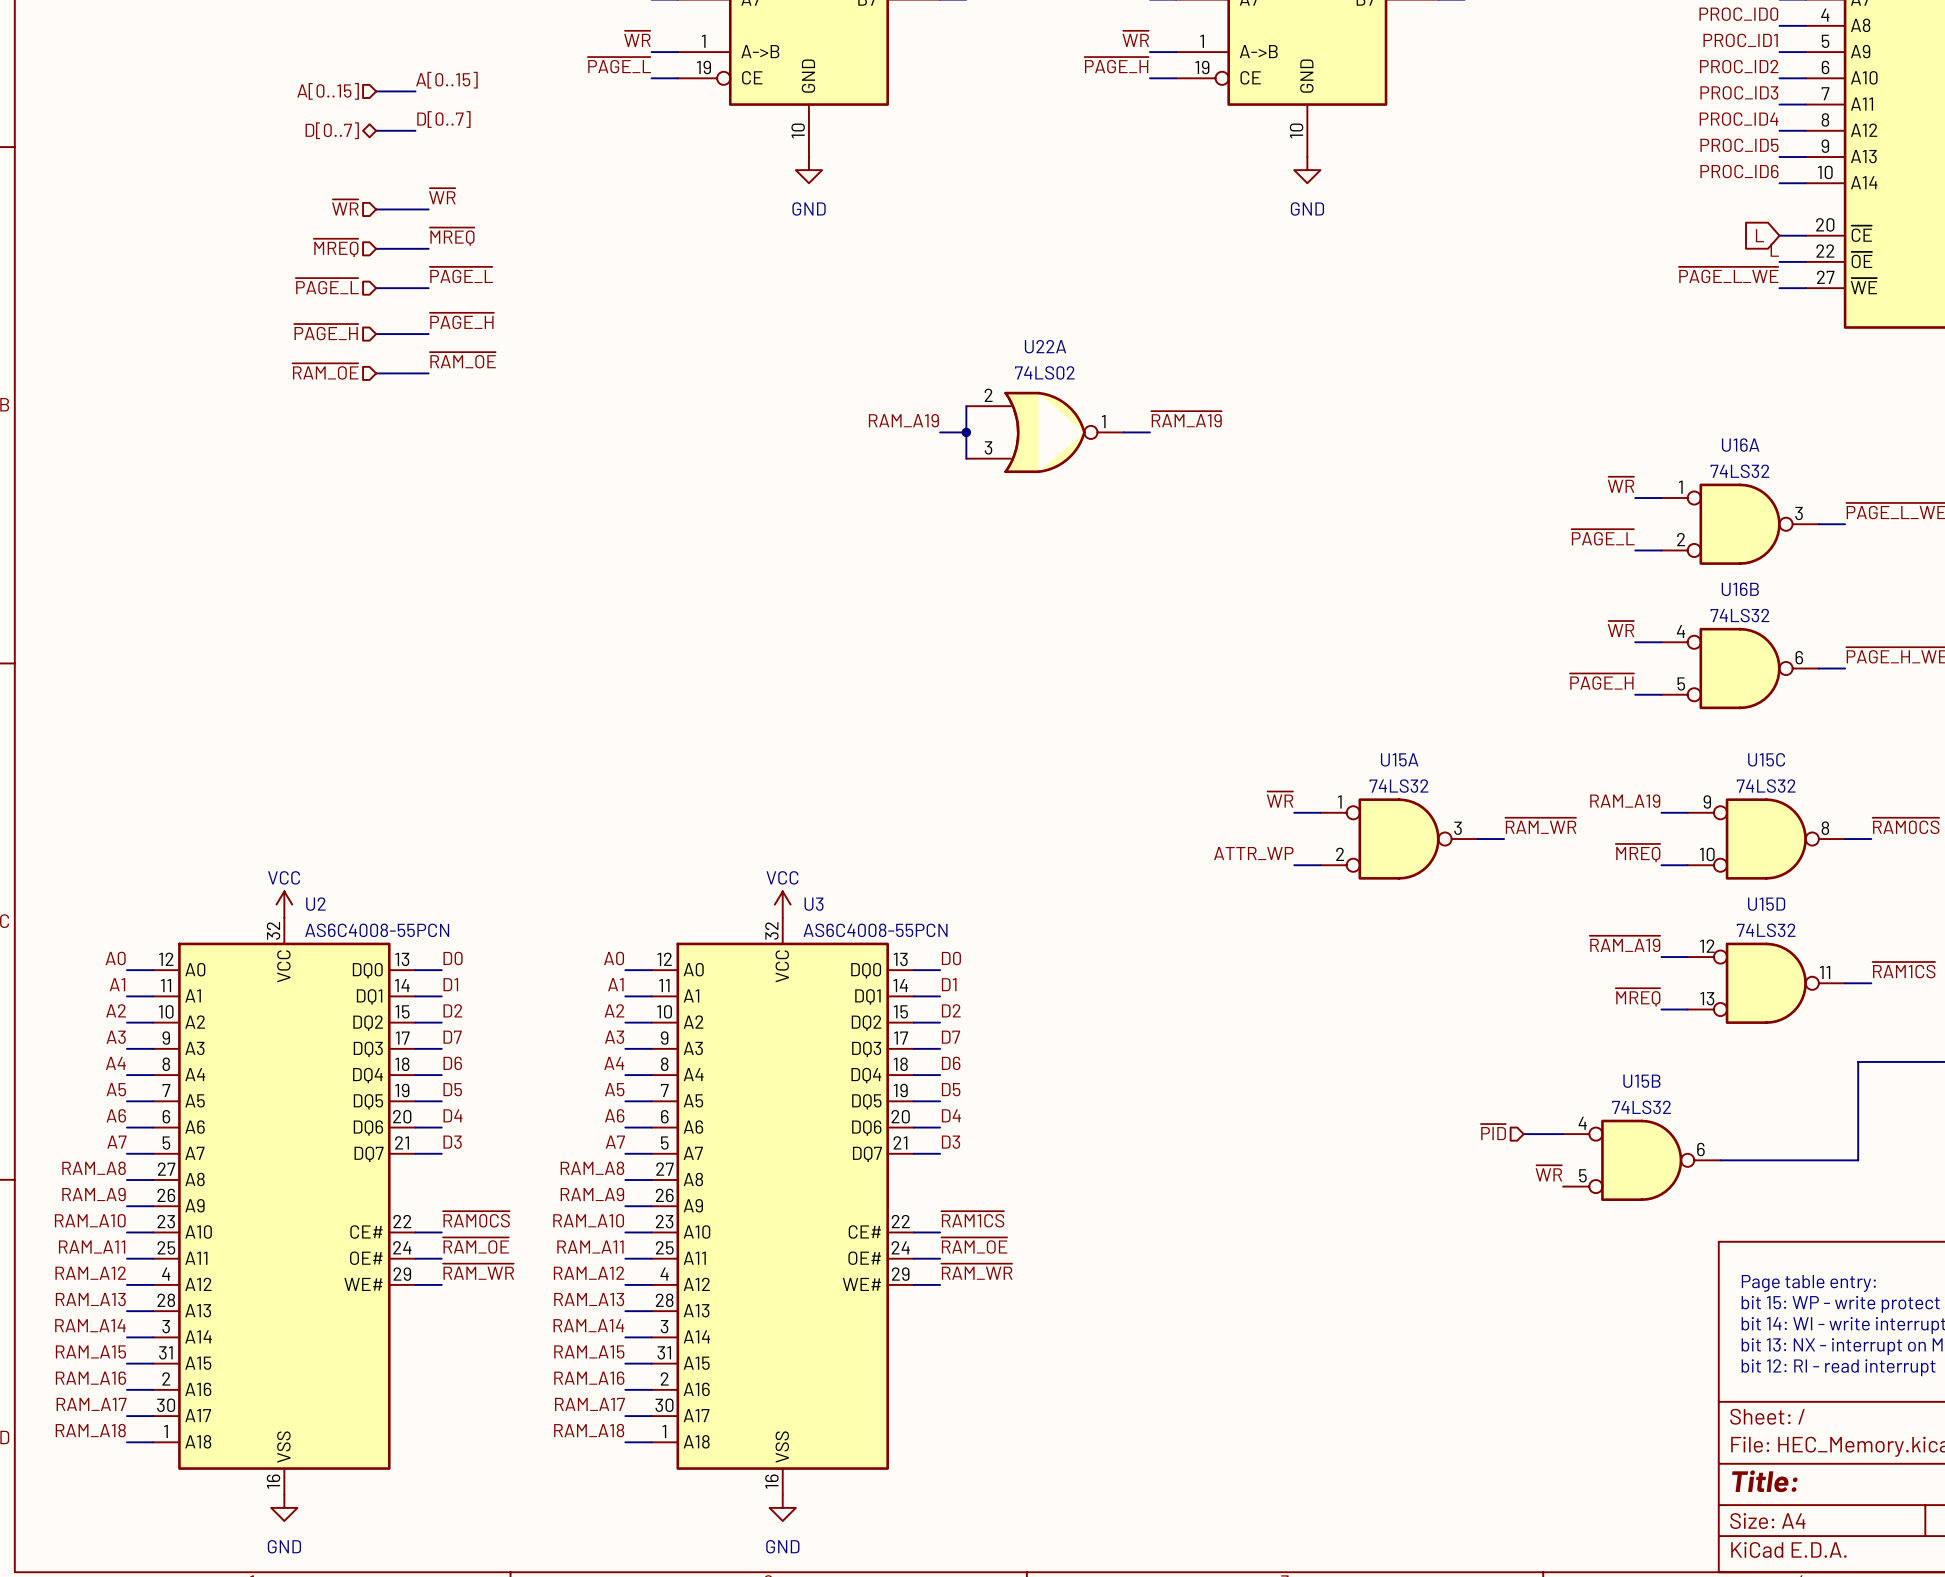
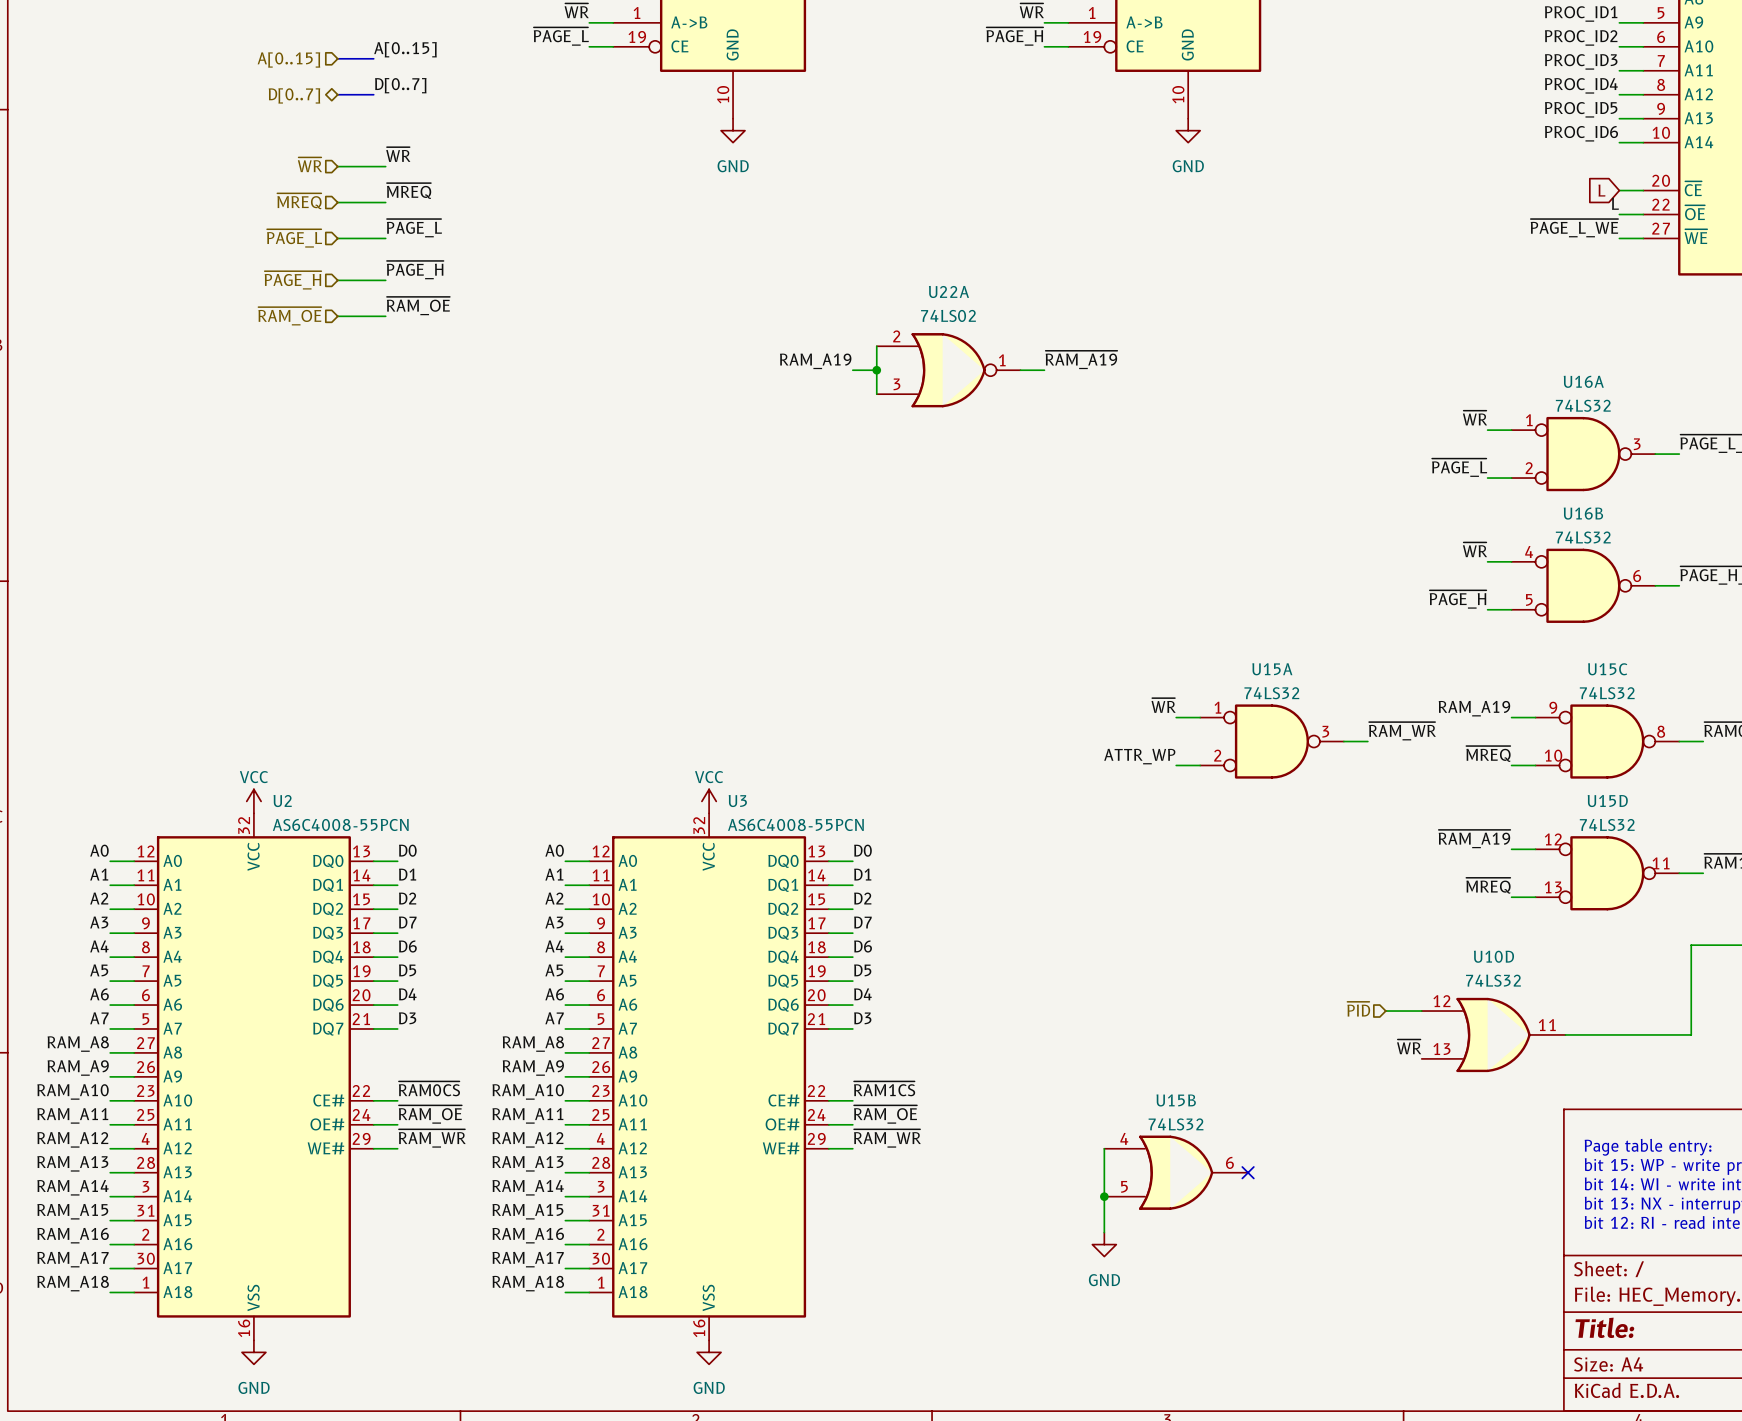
U15B symbol: [1563, 1119, 1721, 1201] -> [1104, 1135, 1249, 1210]
U10D: none -> 74LS32 (1493, 1034)
wire: none -> (1104, 1148) (1104, 1232)
no-connect mark: none -> (1248, 1172)
junction: none -> (1104, 1196)
power symbol: none -> GND (1104, 1244)

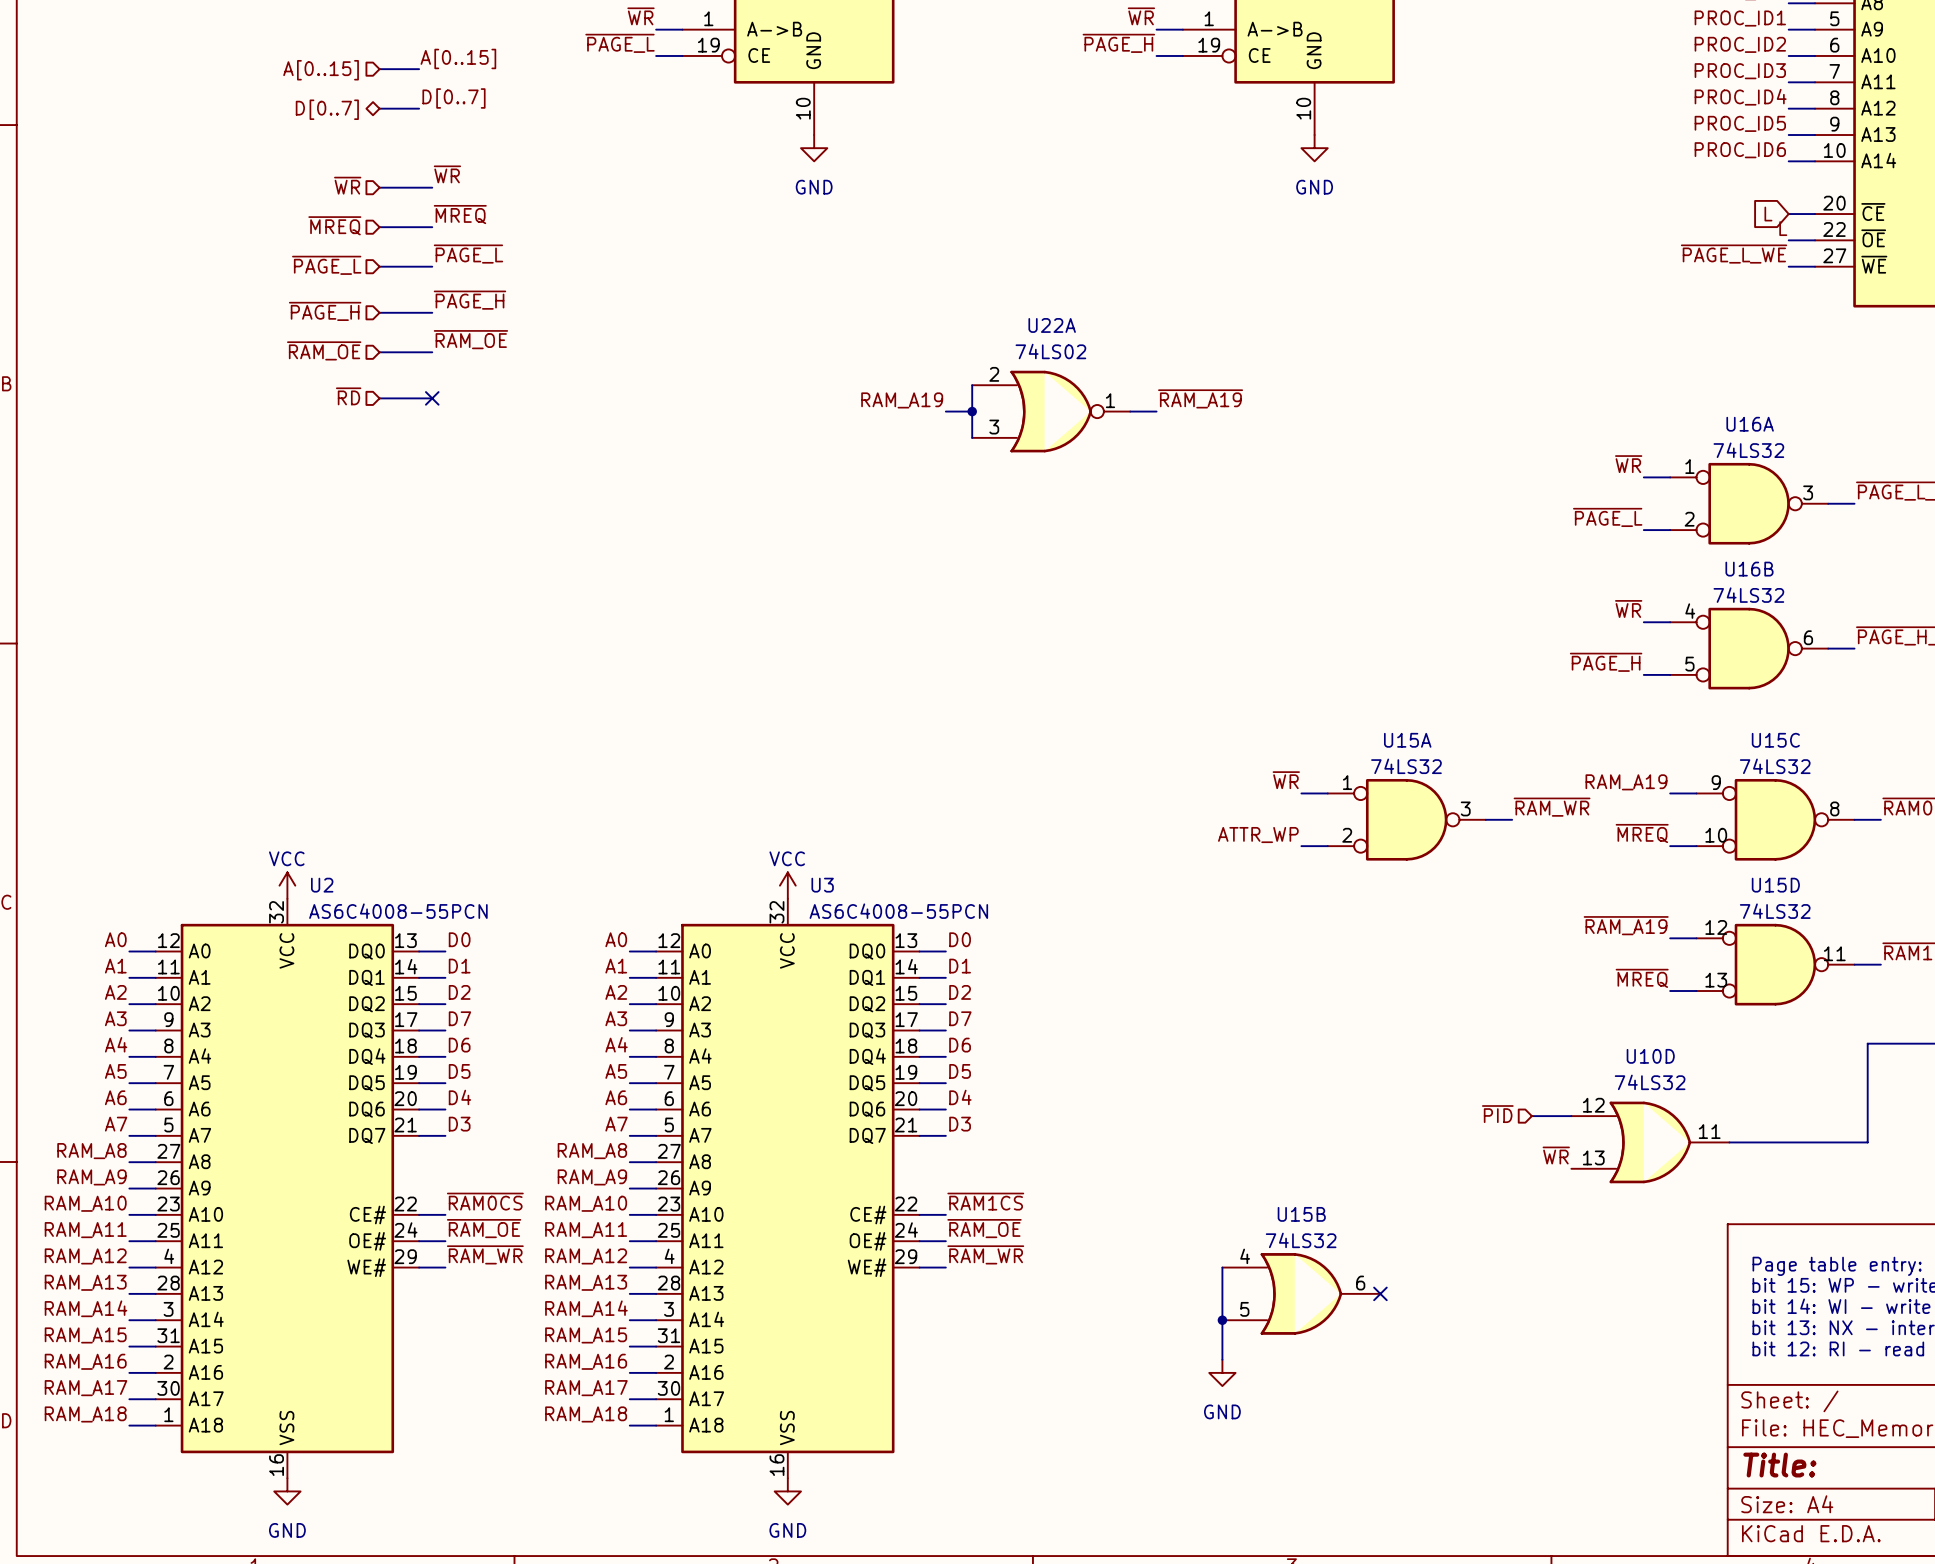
hierarchical label: none -> ~{RD} (348, 396)
wire: none -> (379, 398) (432, 398)
no-connect mark: none -> (432, 398)

